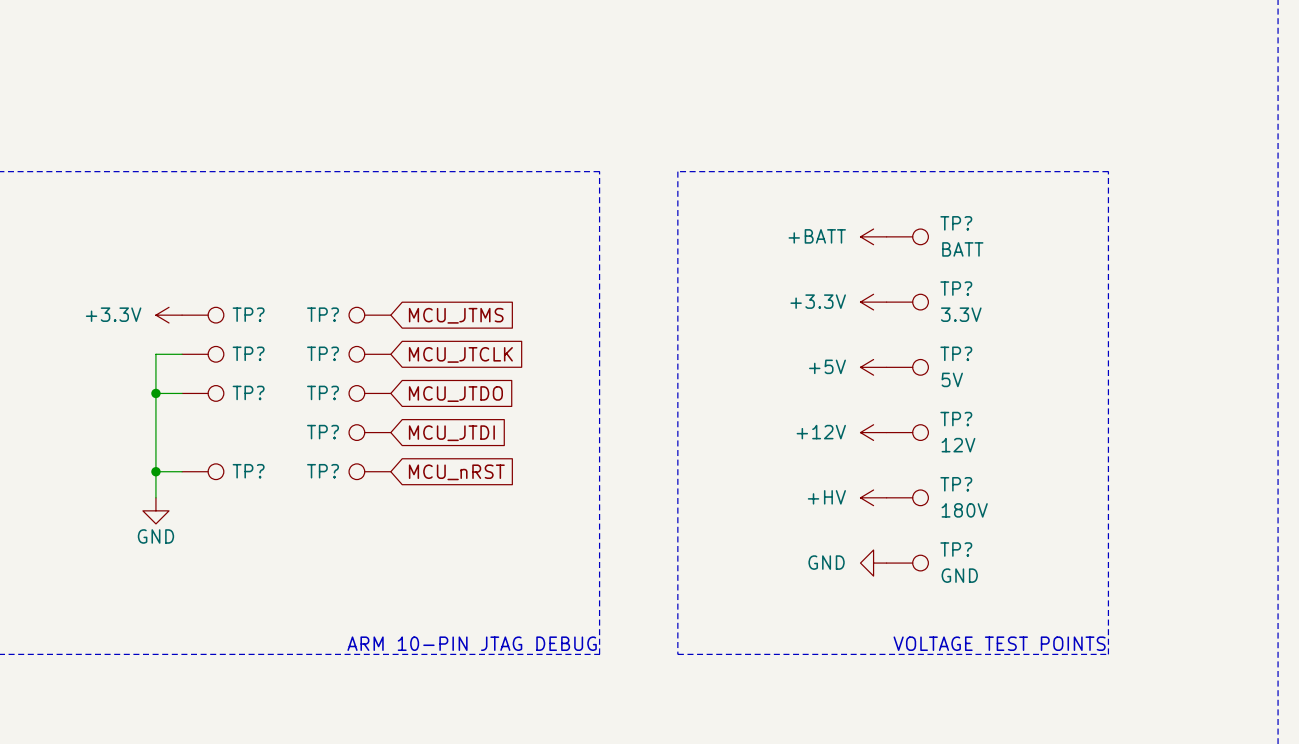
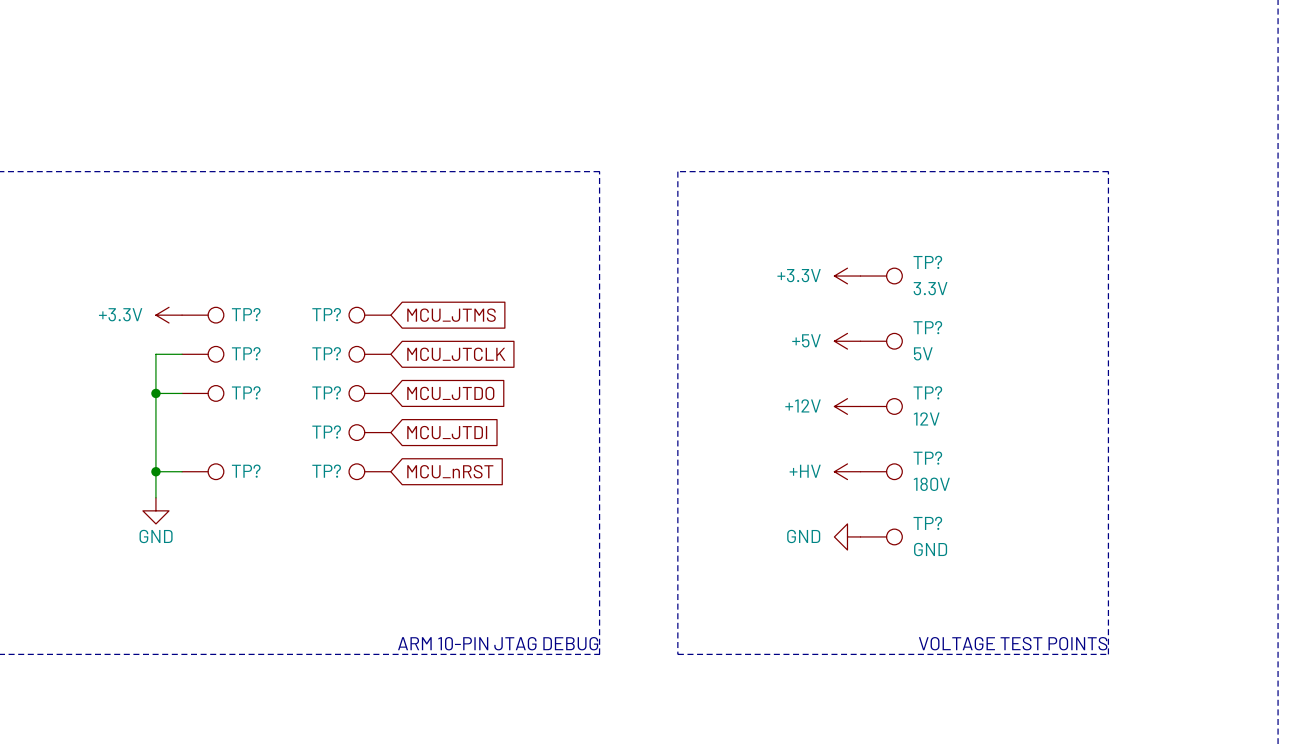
power symbol: +BATT (873, 236) -> none
TP?: BATT (907, 236) -> none
power symbol position: +3.3V (873, 302) -> +3.3V (847, 276)
TP? position: (907, 302) -> (881, 276)
power symbol position: +5V (873, 367) -> +5V (847, 341)
TP? position: (907, 367) -> (881, 341)
power symbol position: +12V (873, 432) -> +12V (847, 406)
TP? position: (907, 432) -> (881, 406)
power symbol position: +HV (873, 497) -> +HV (847, 471)
TP? position: (907, 497) -> (881, 471)
power symbol position: GND (873, 563) -> GND (847, 536)
TP? position: (907, 563) -> (881, 536)

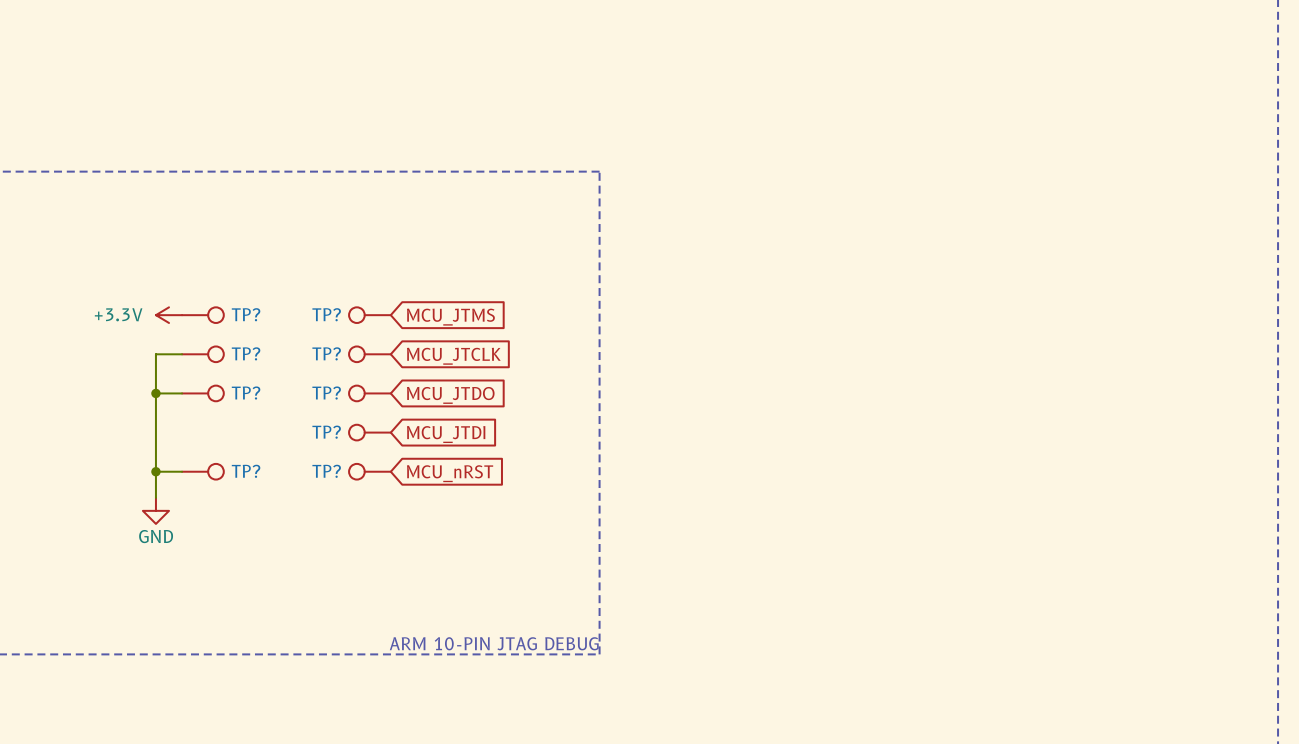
line: (677, 171) (677, 654) (1108, 654) (1108, 171) (677, 171) -> none
power symbol: +3.3V (847, 276) -> none
TP?: 3.3V (881, 276) -> none
power symbol: +5V (847, 341) -> none
TP?: 5V (881, 341) -> none
power symbol: +12V (847, 406) -> none
TP?: 12V (881, 406) -> none
power symbol: +HV (847, 471) -> none
TP?: 180V (881, 471) -> none
power symbol: GND (847, 536) -> none
TP?: GND (881, 536) -> none
text: VOLTAGE TEST POINTS (1013, 643) -> none

